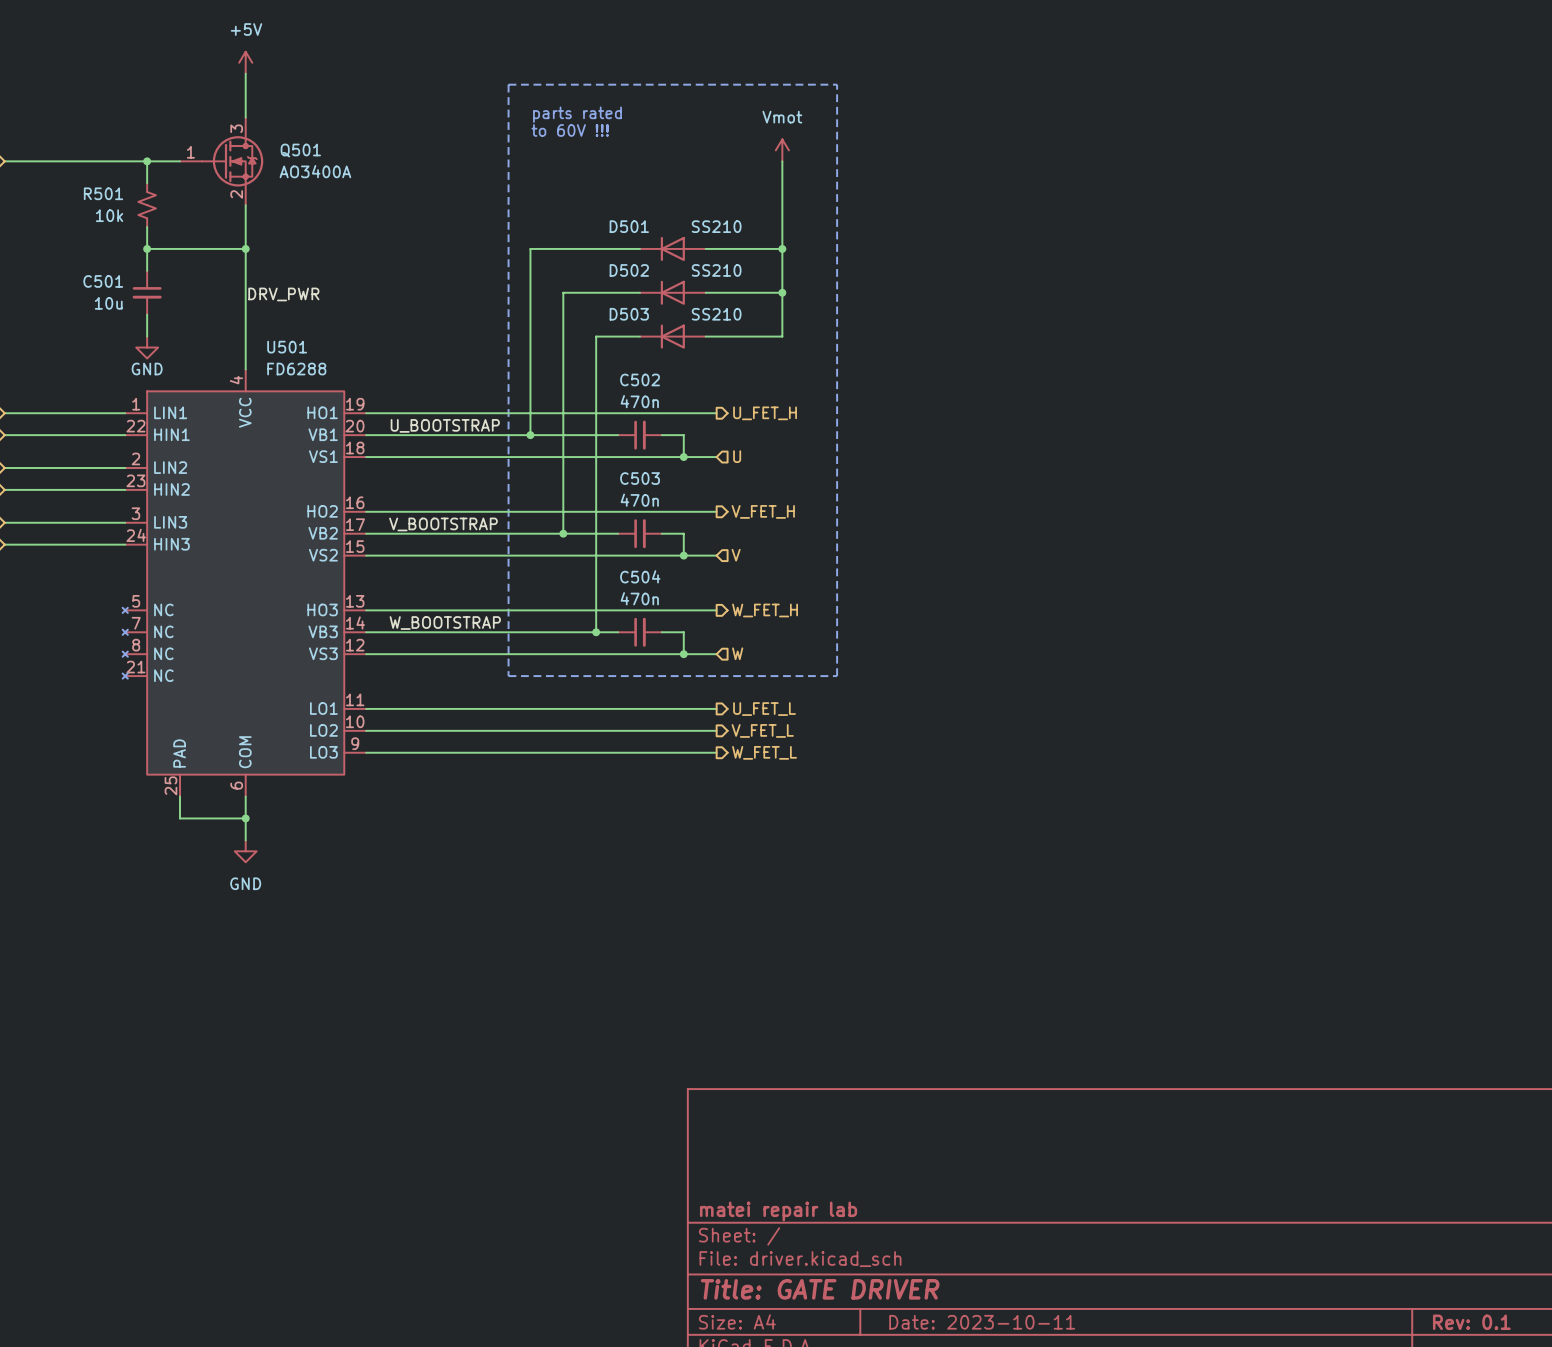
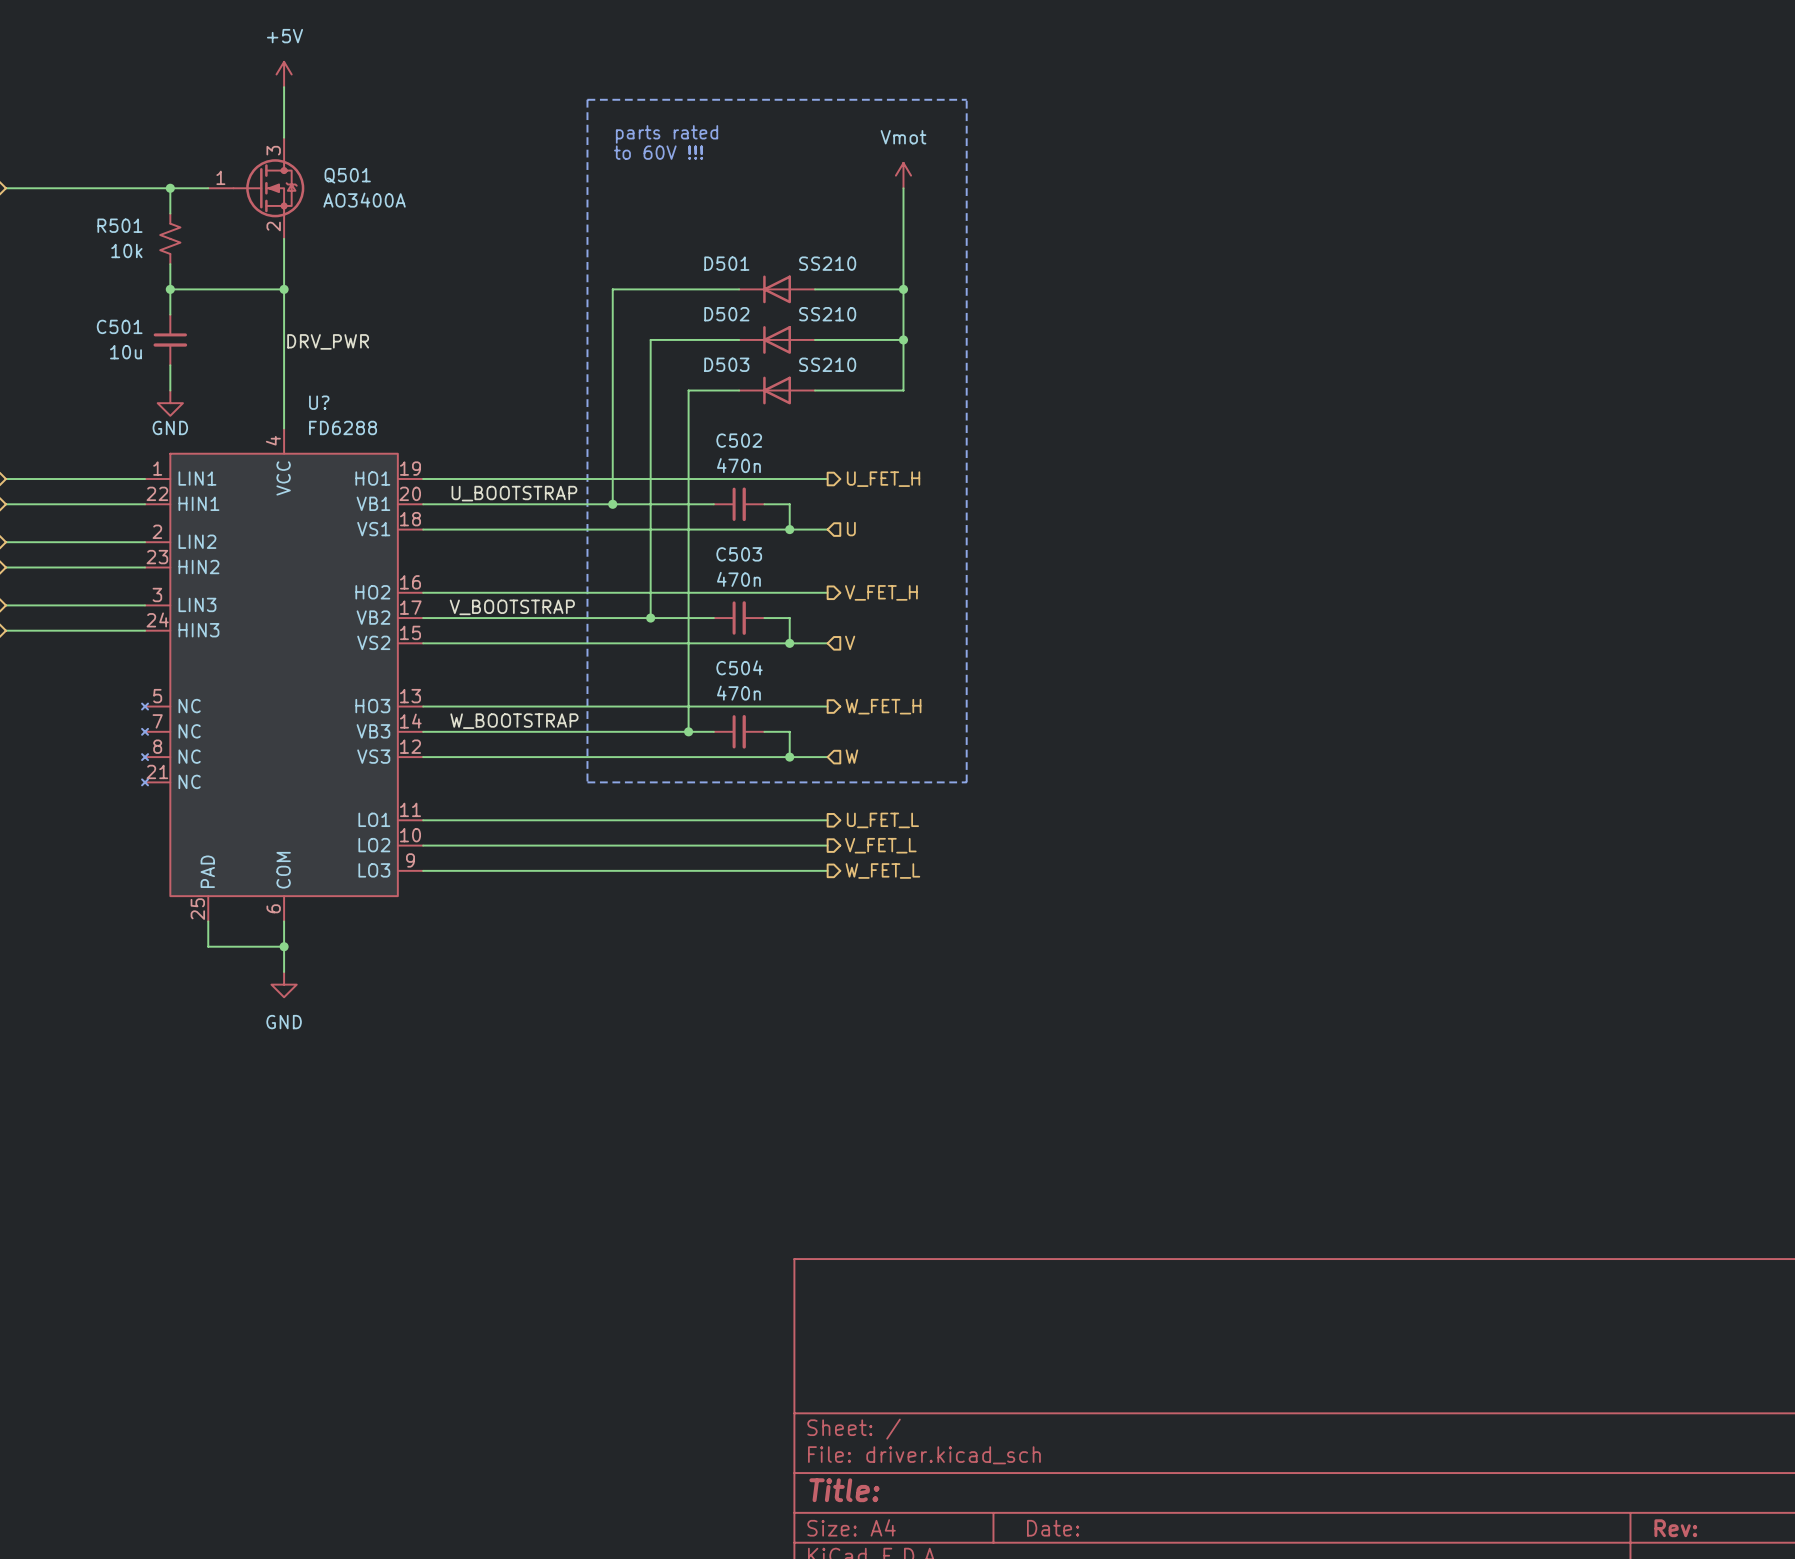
U501 name: U501 (287, 347) -> U? (319, 402)
title block: matei repair lab (778, 1211) -> none
title block: Title: GATE DRIVER (820, 1289) -> Title: (844, 1490)
title block: Date: 2023-10-11 (982, 1322) -> Date: (1053, 1528)
title block: Rev: 0.1 (1471, 1322) -> Rev: (1675, 1528)

